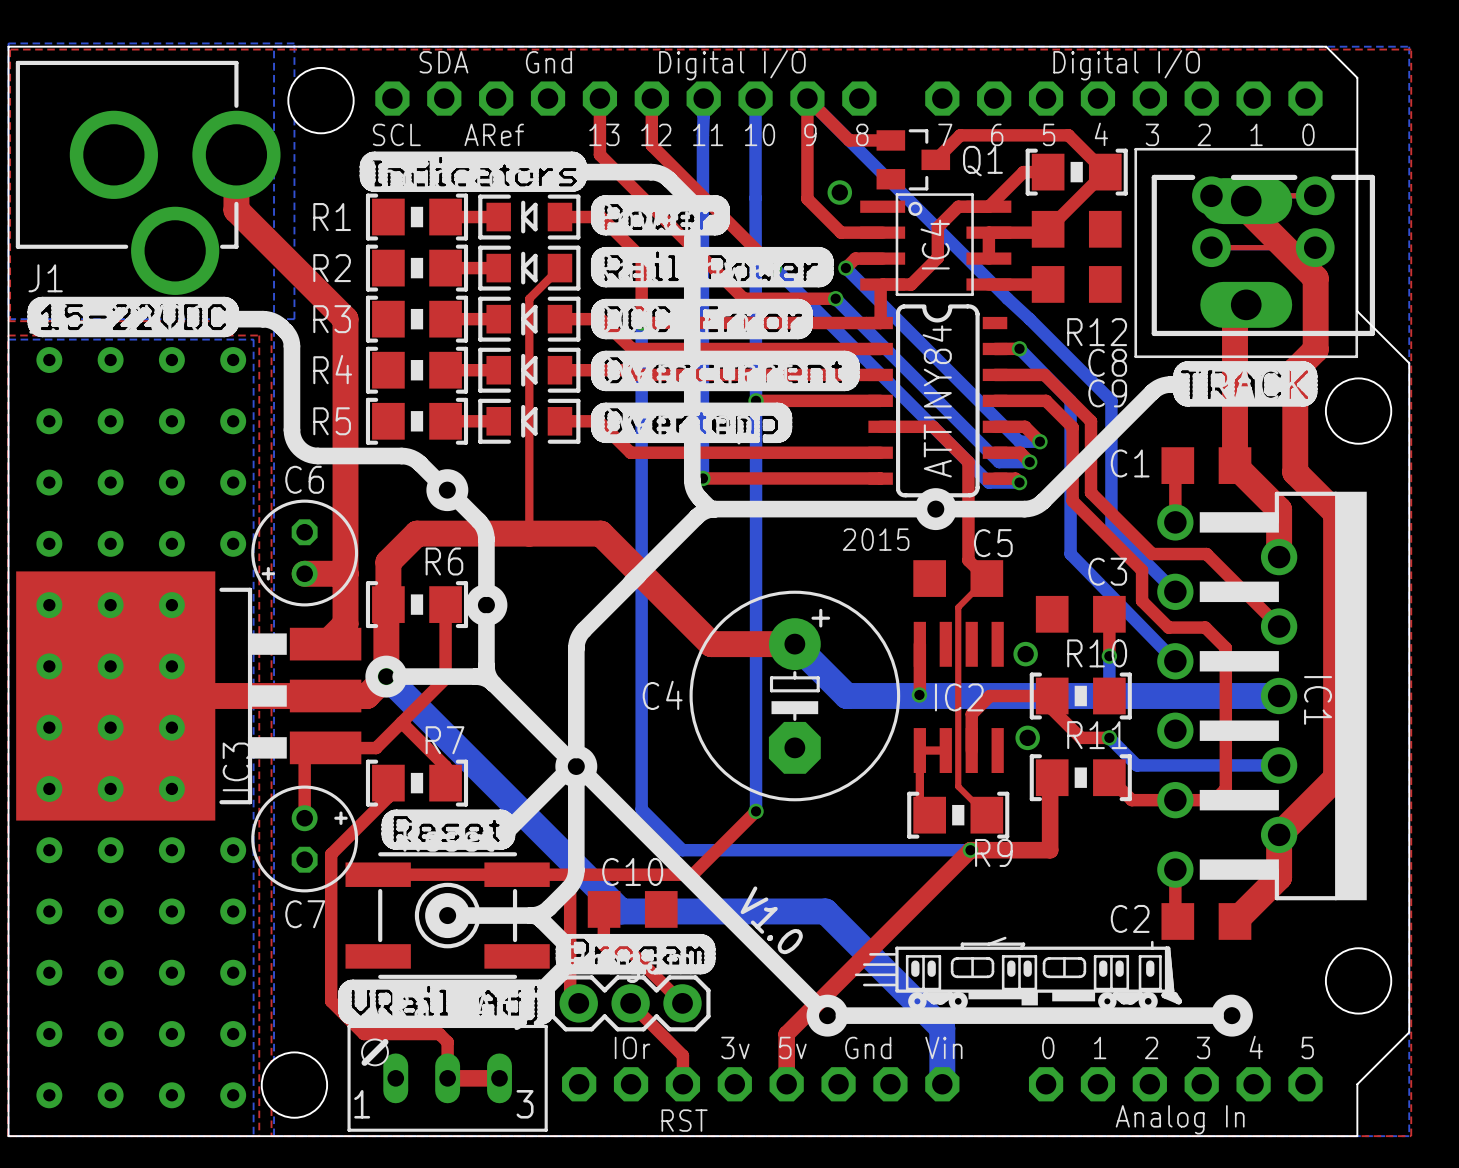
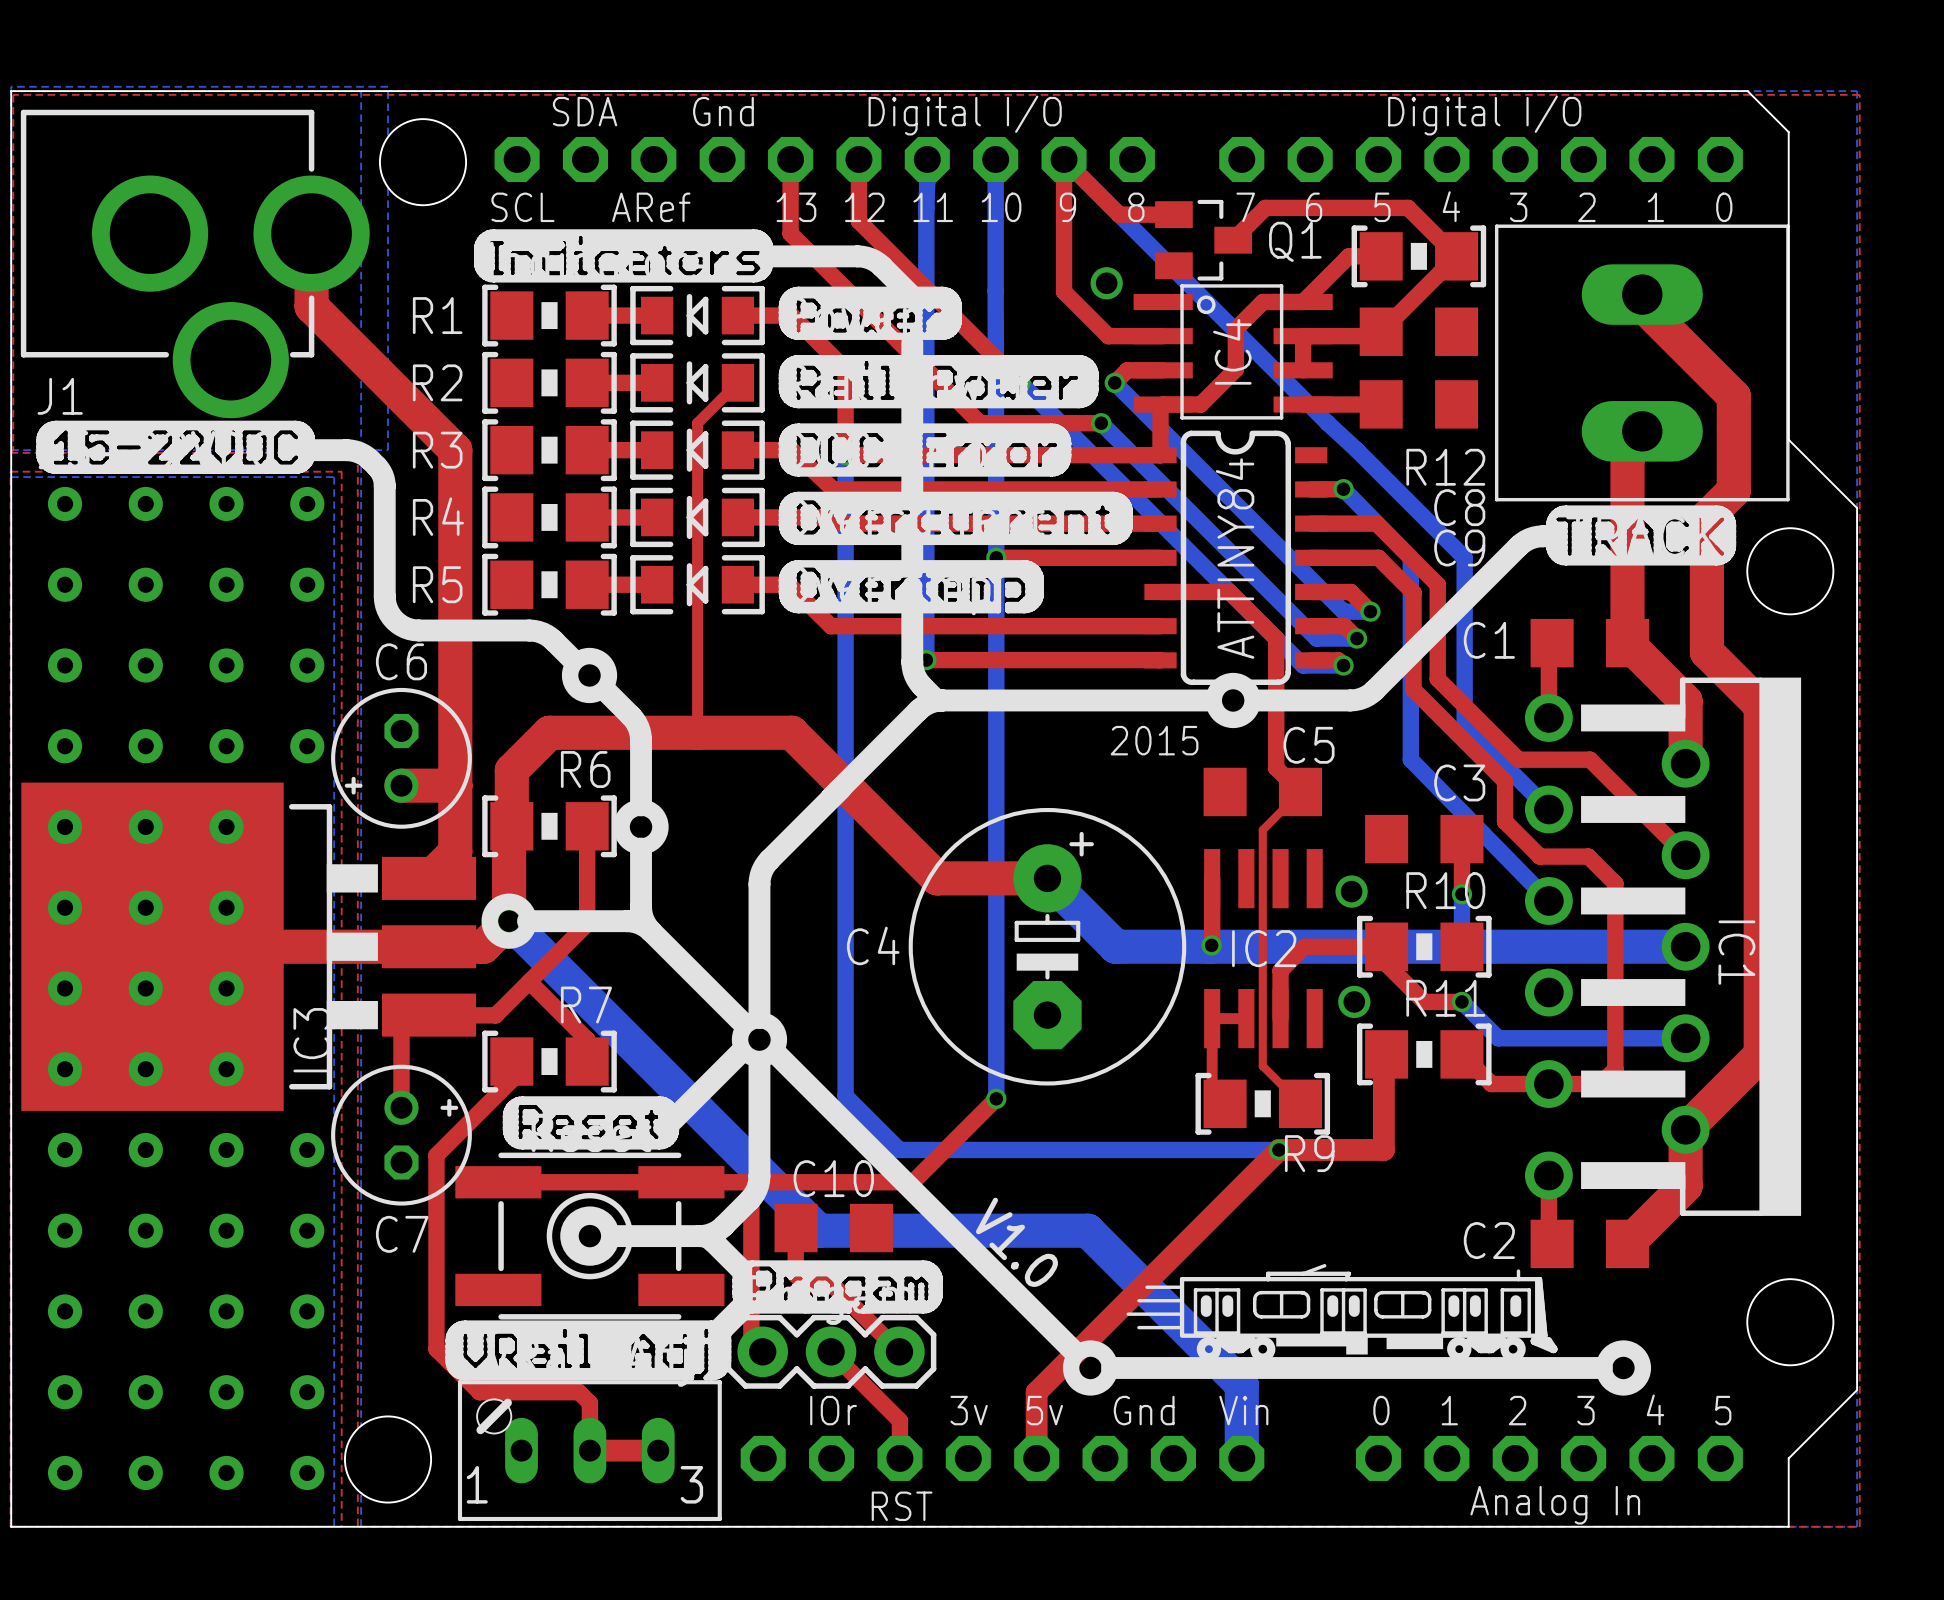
part: (1263, 255) -> none

